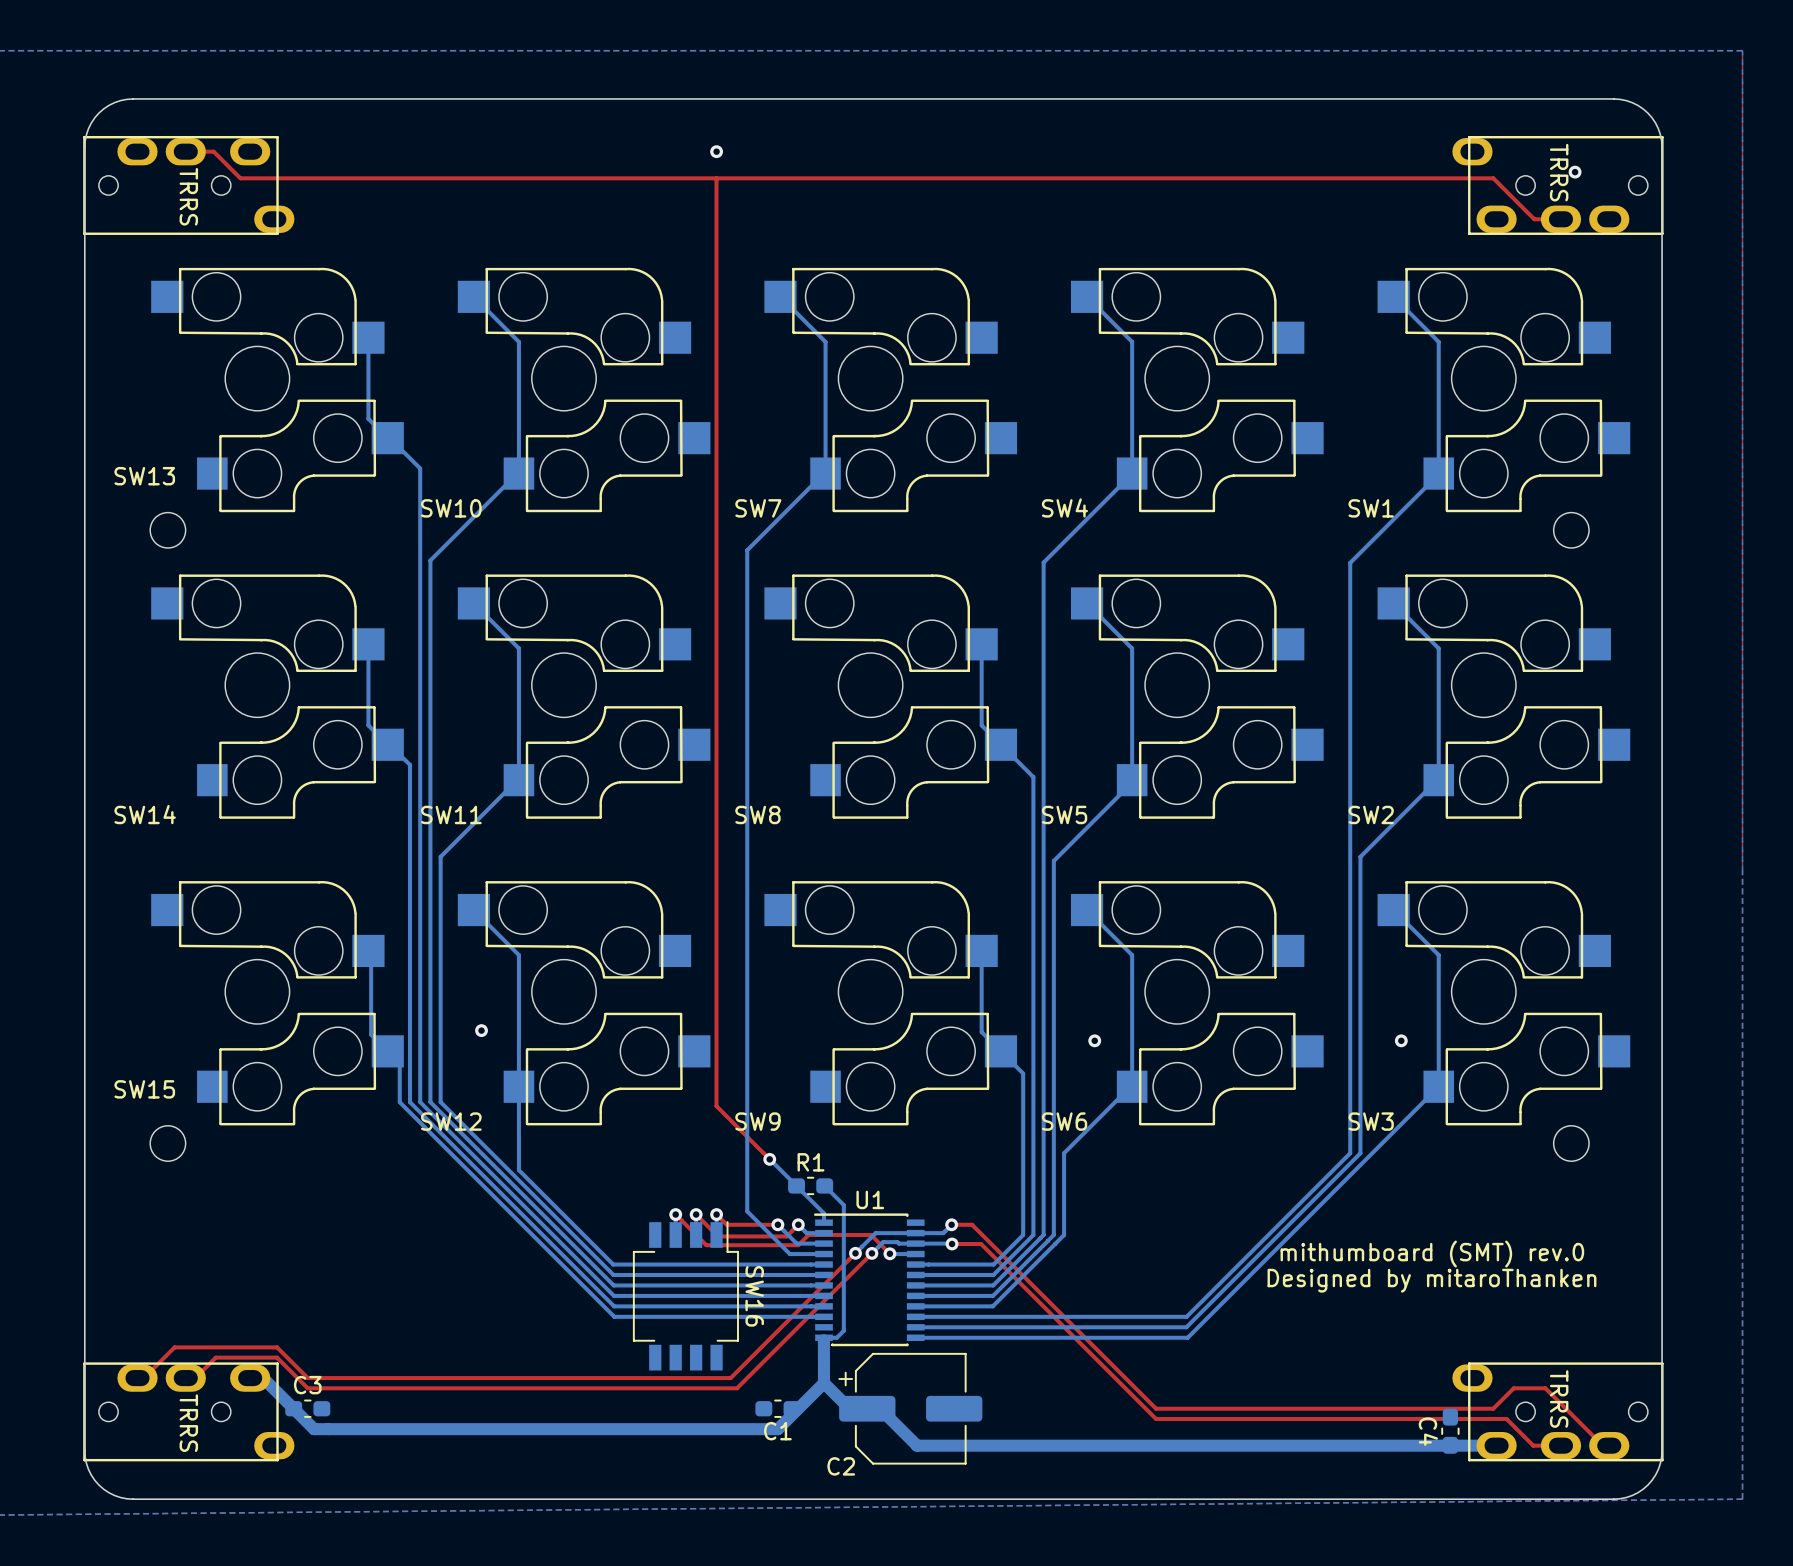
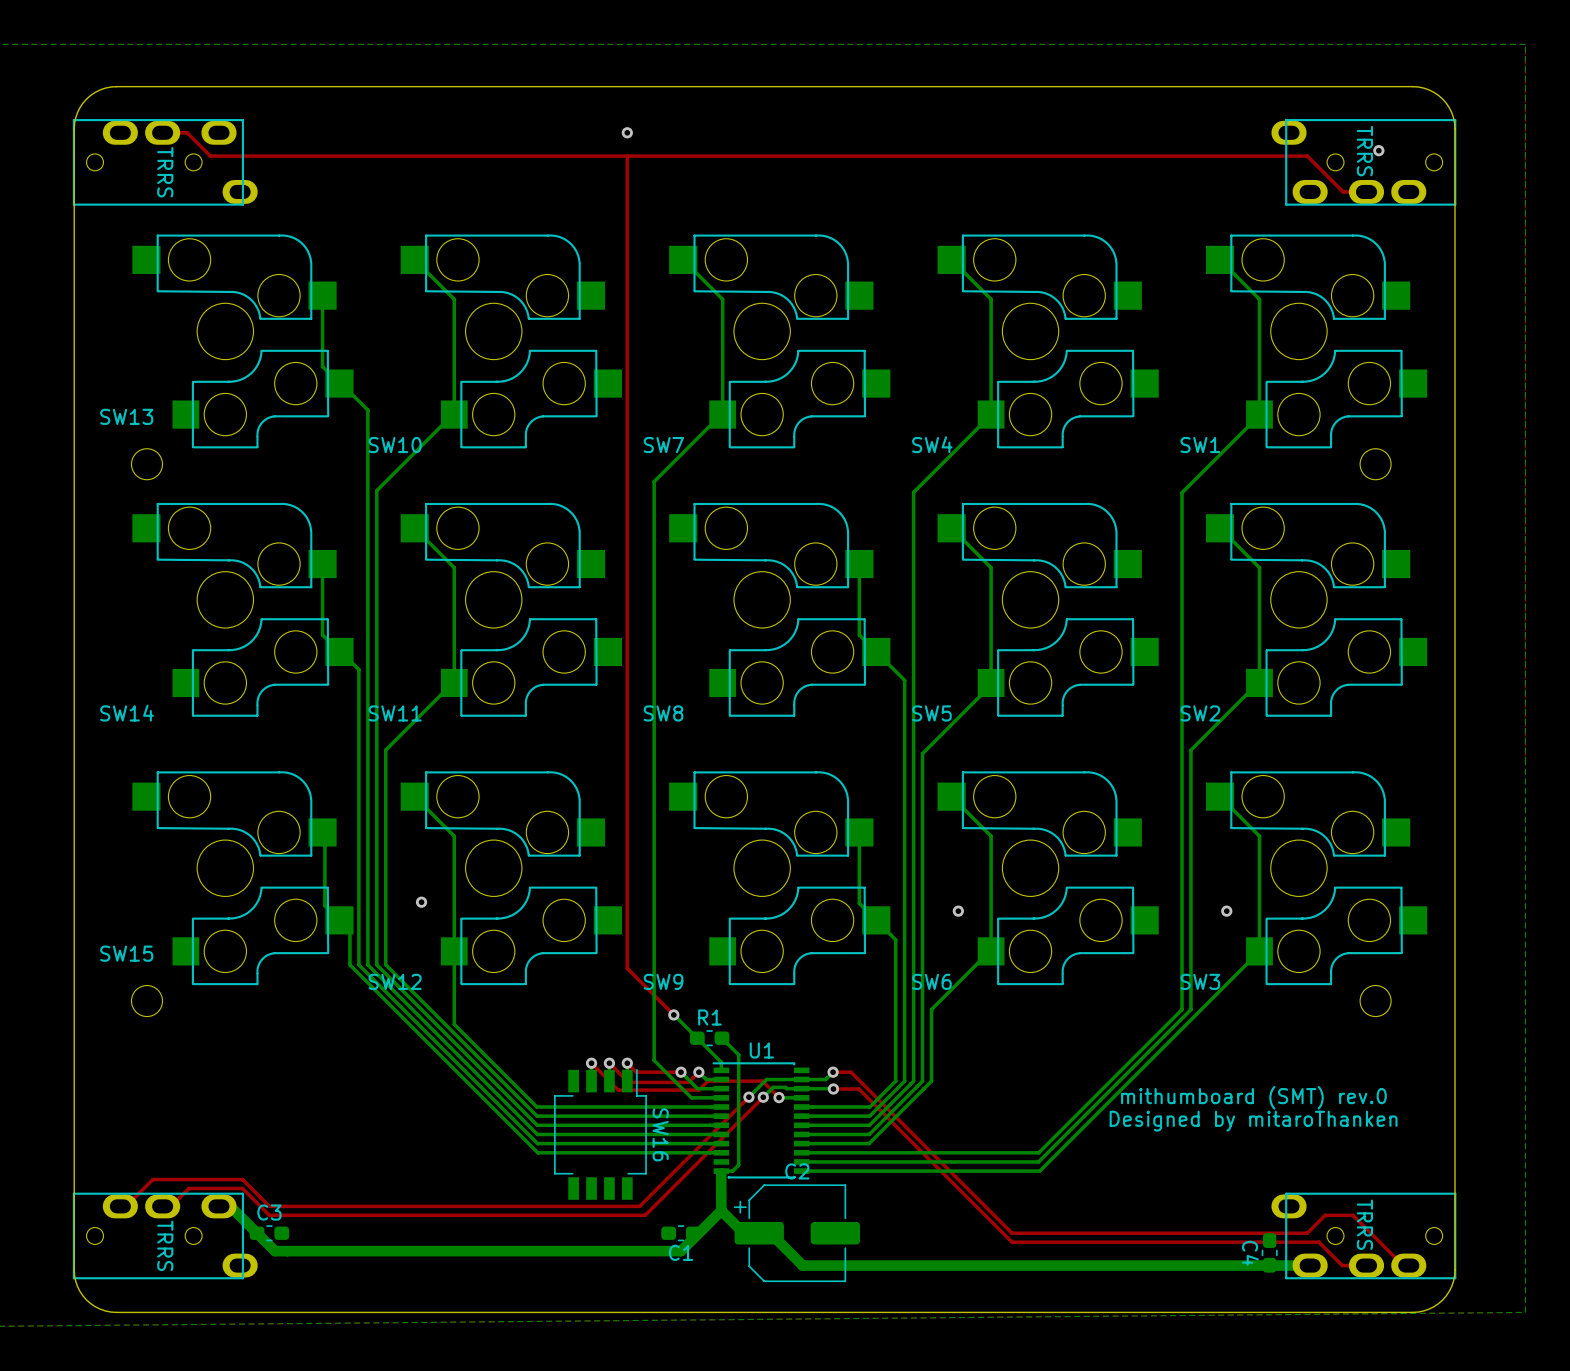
C2 name position: C2 (841, 1466) -> C2 (797, 1171)

